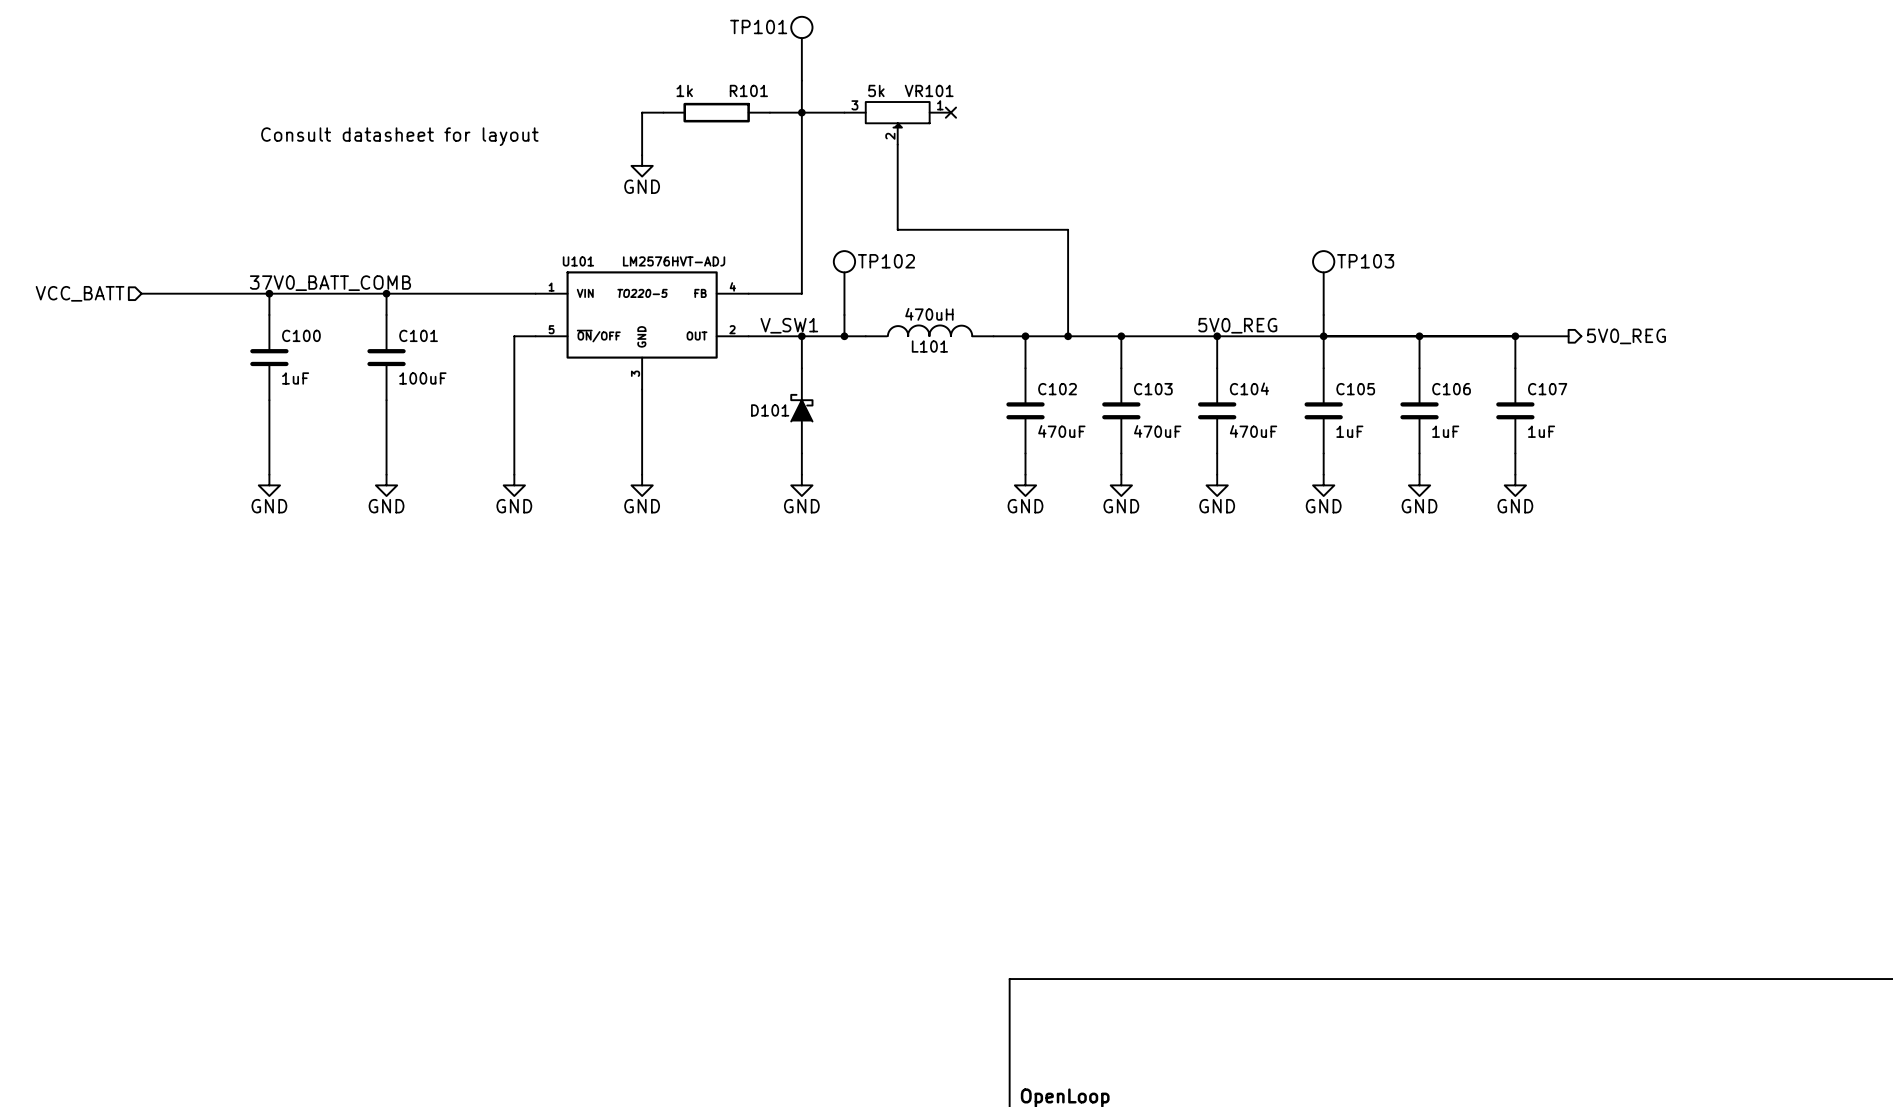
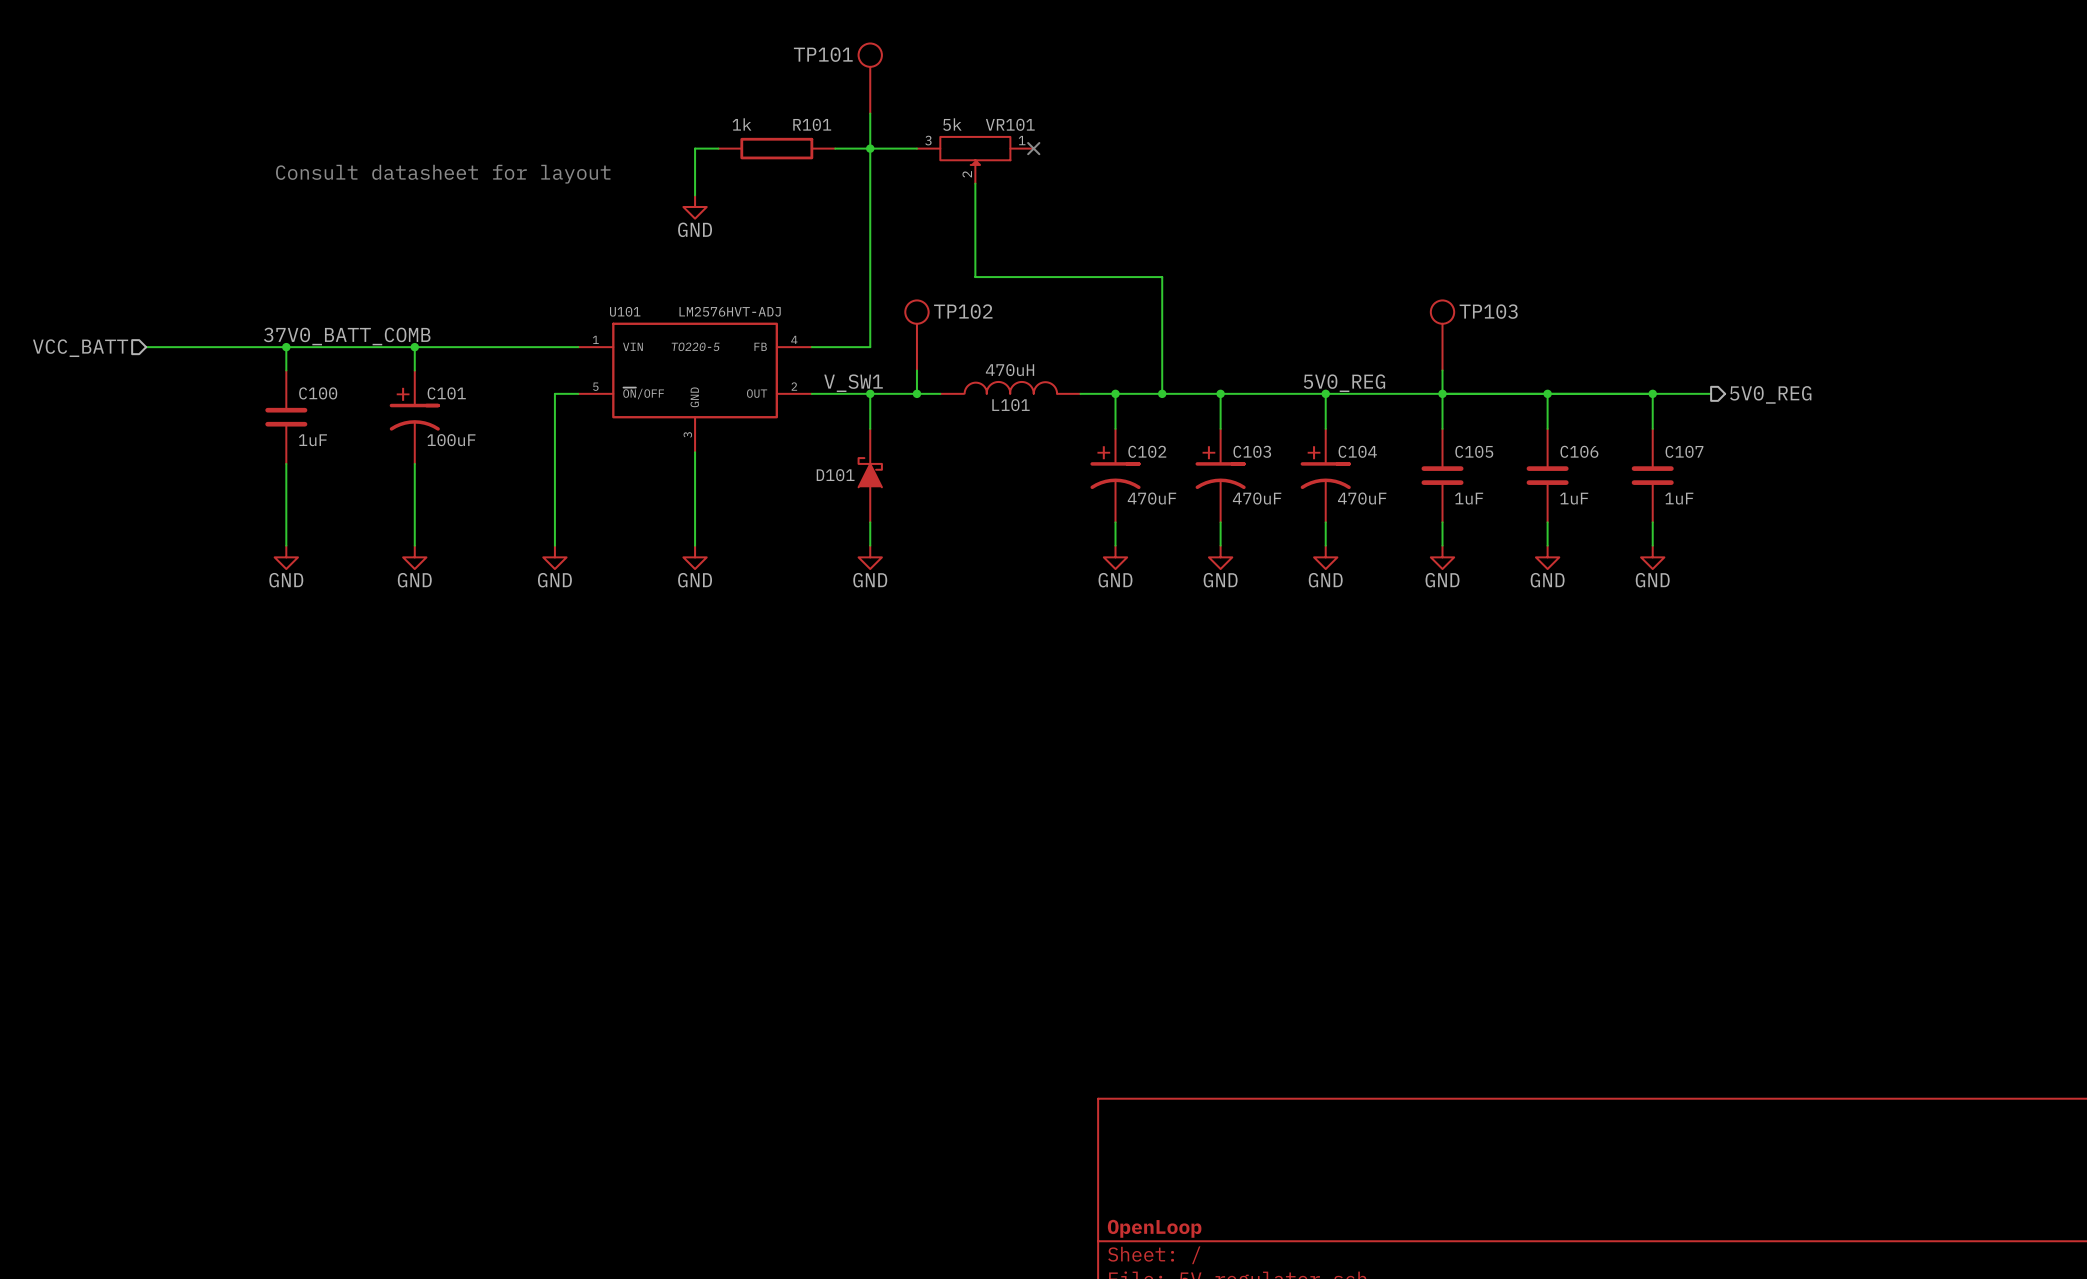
C101 symbol: [367, 314, 406, 401] -> [389, 370, 440, 464]
C102 symbol: [1006, 368, 1045, 454] -> [1090, 428, 1141, 523]
C103 symbol: [1102, 368, 1141, 454] -> [1195, 428, 1246, 523]
C104 symbol: [1198, 368, 1237, 454] -> [1300, 428, 1351, 523]

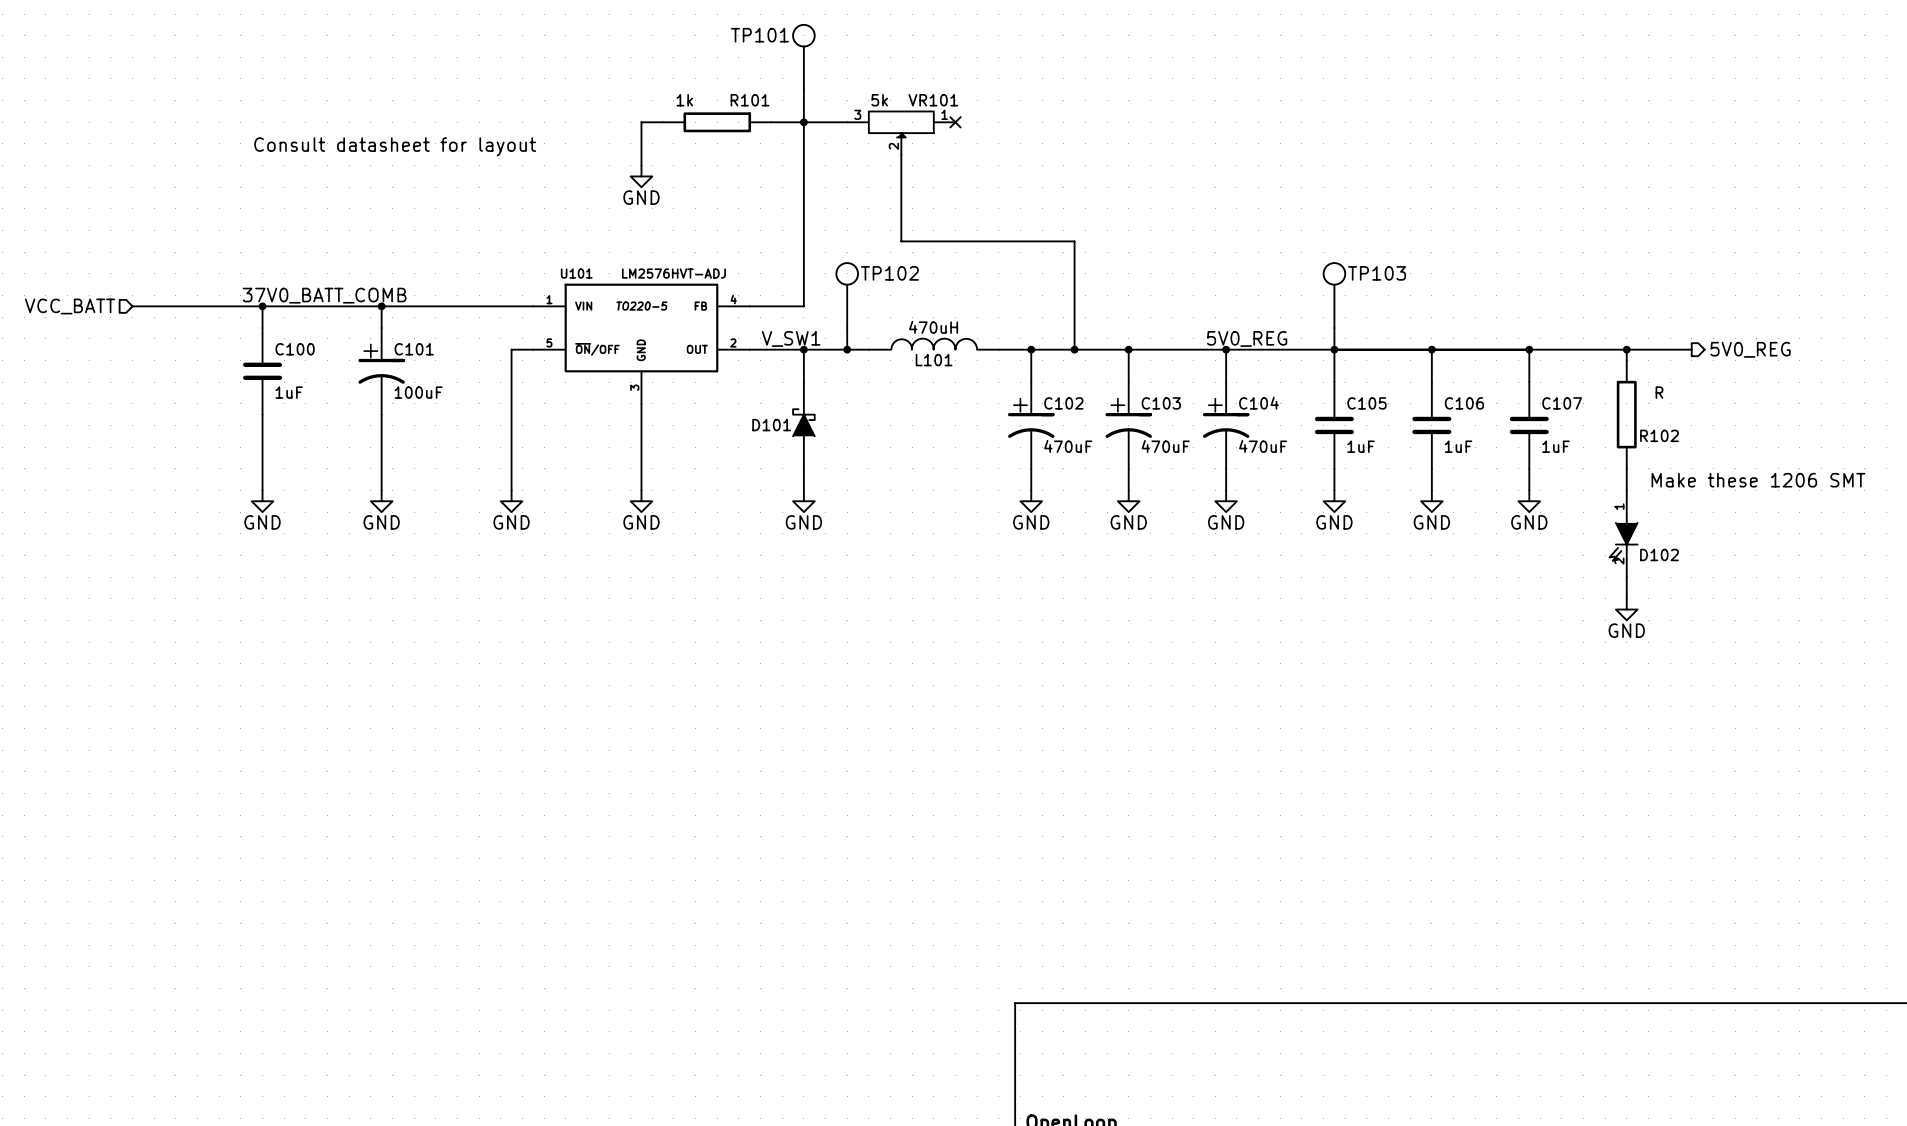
wire: none -> (1583, 349) (1691, 349)
wire: none -> (1626, 349) (1626, 360)
junction: none -> (1626, 349)
hierarchical label position: 5V0_REG (1770, 394) -> 5V0_REG (1750, 349)
R102: none -> R (1626, 414)
wire: none -> (1626, 468) (1626, 490)
text: none -> Make these 1206 SMT (1758, 480)
D102: none -> (1623, 533)
wire: none -> (1626, 577) (1626, 598)
power symbol: none -> GND (1626, 609)

